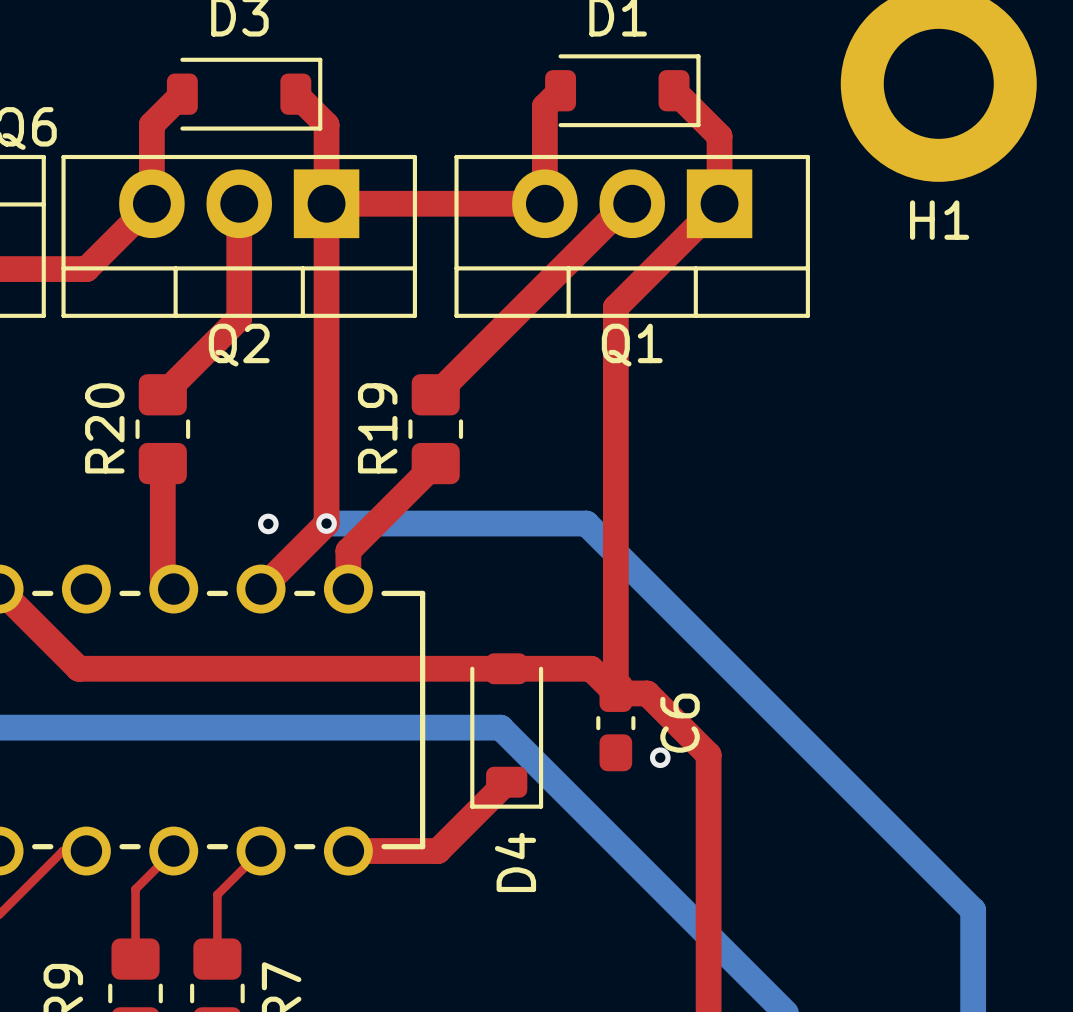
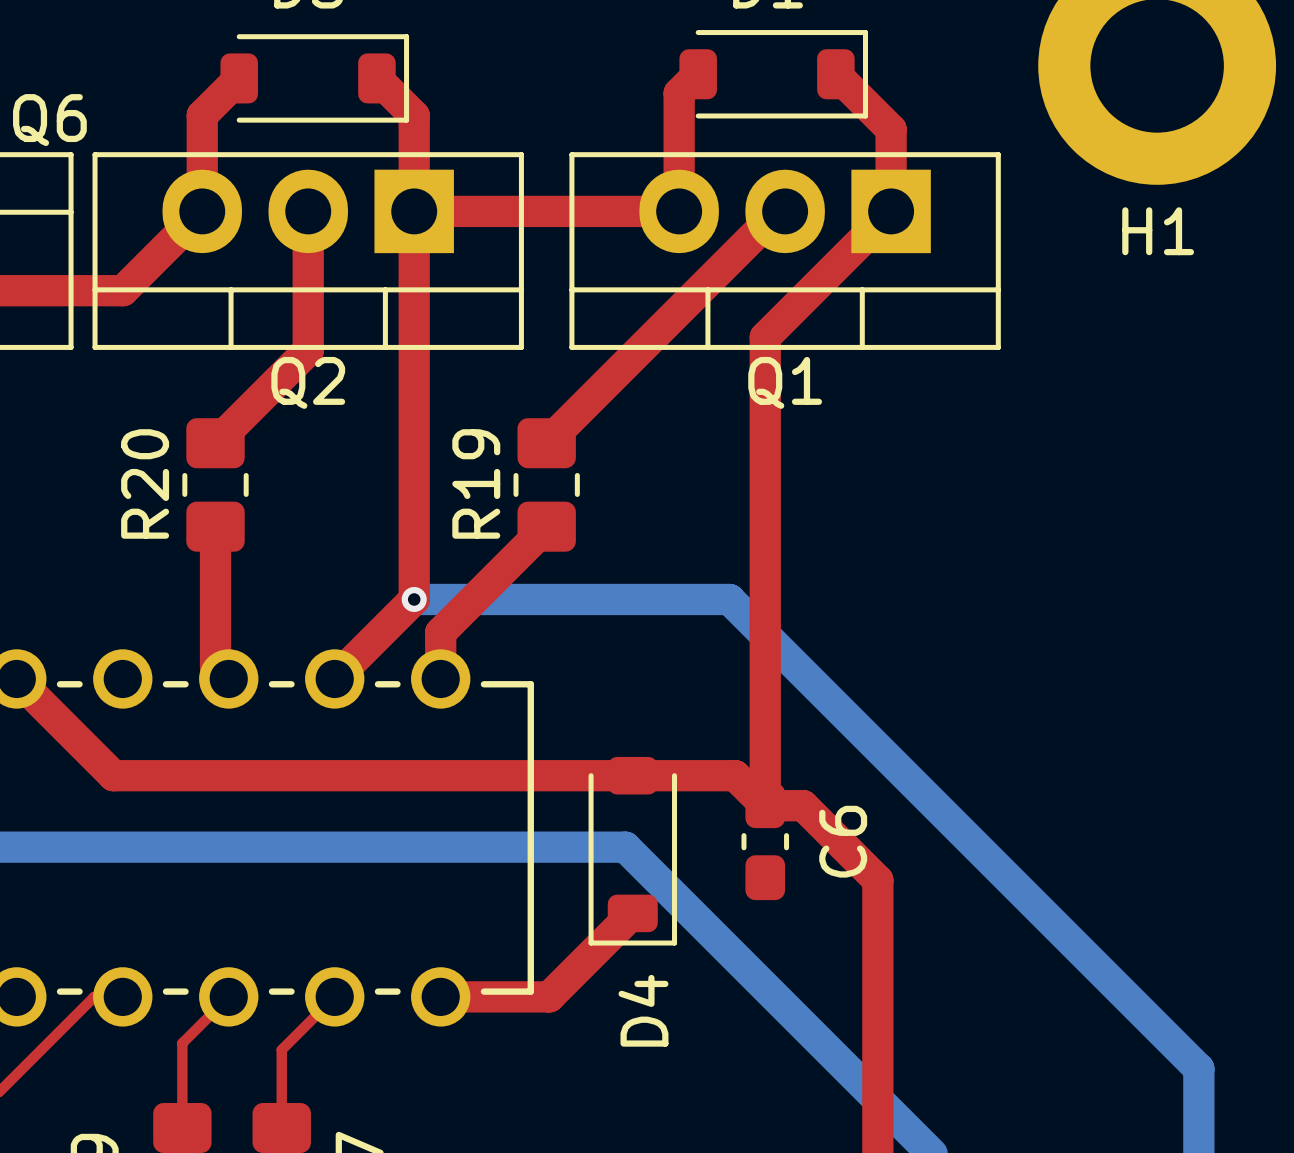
via: (268, 523) -> none
via: (660, 757) -> none

